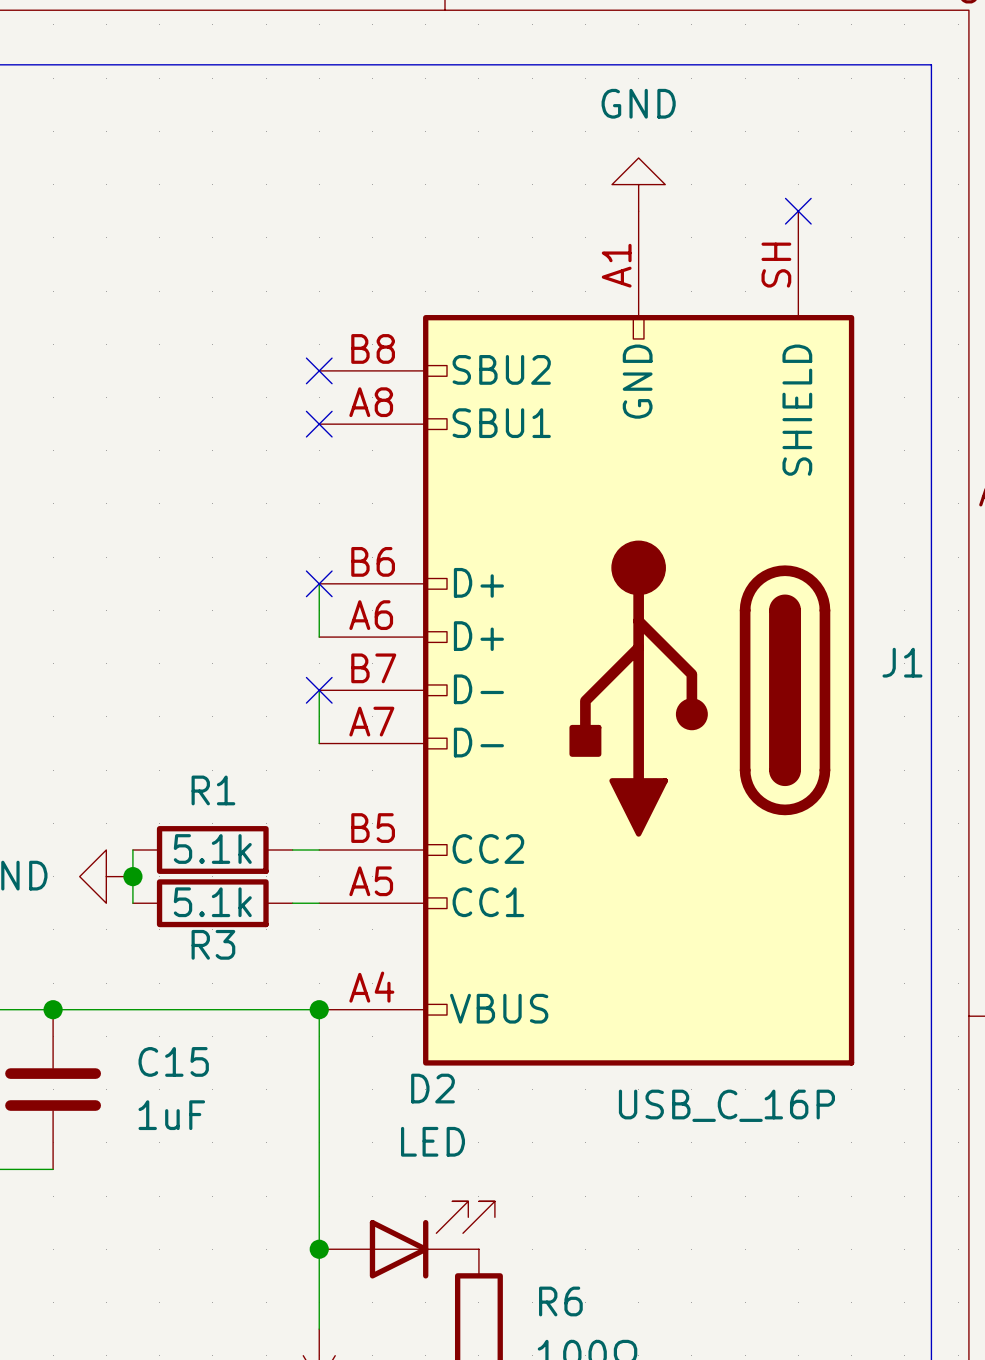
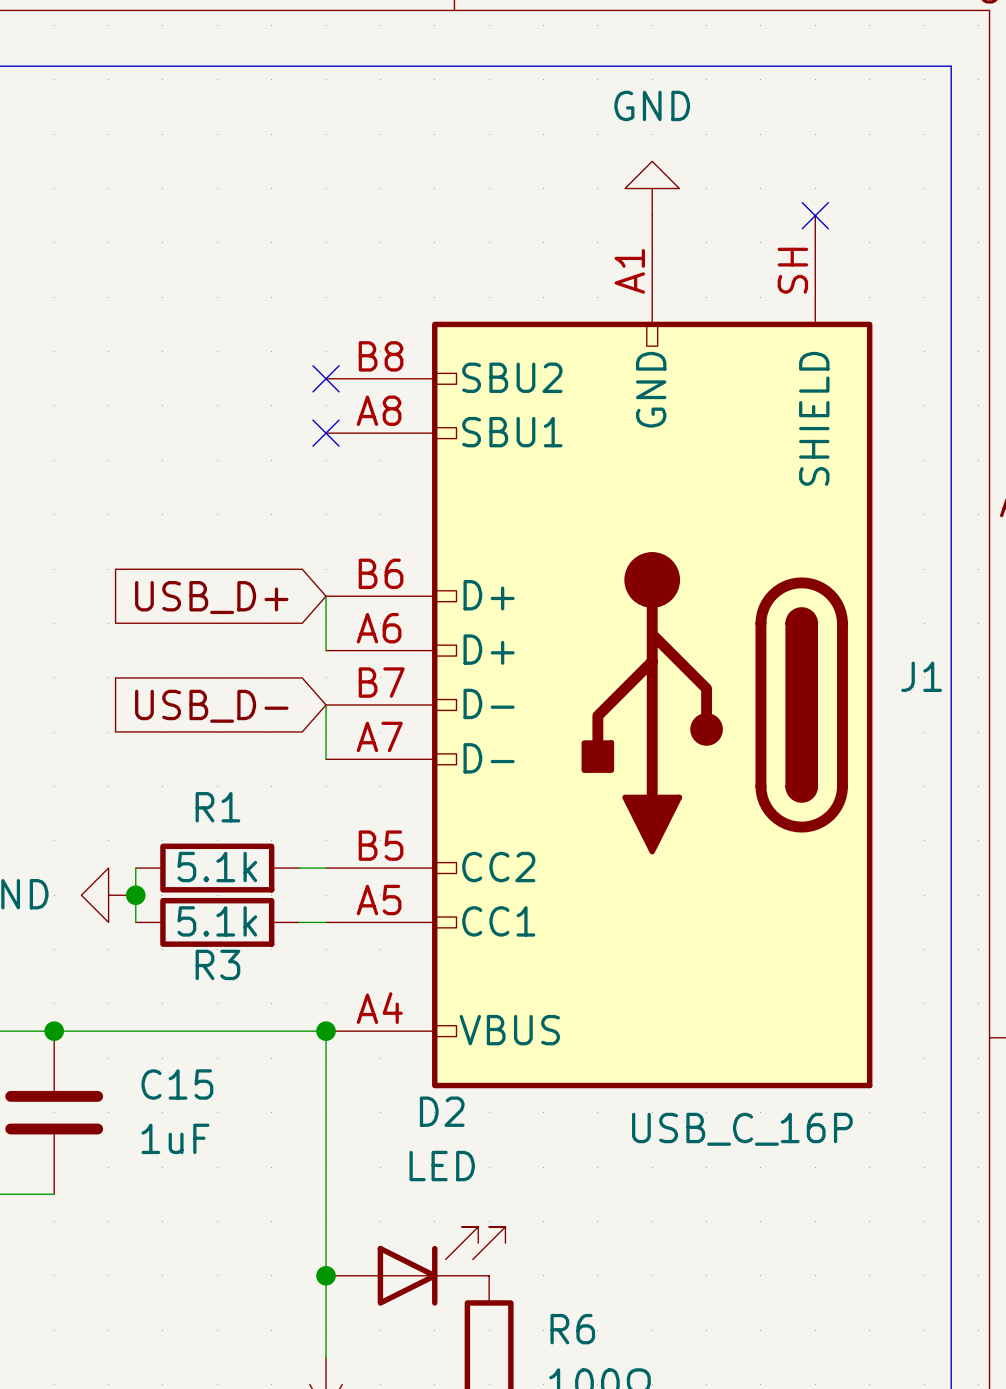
no-connect mark: (319, 583) -> none
global label: none -> USB_D+ (211, 597)
no-connect mark: (319, 690) -> none
global label: none -> USB_D- (211, 706)

